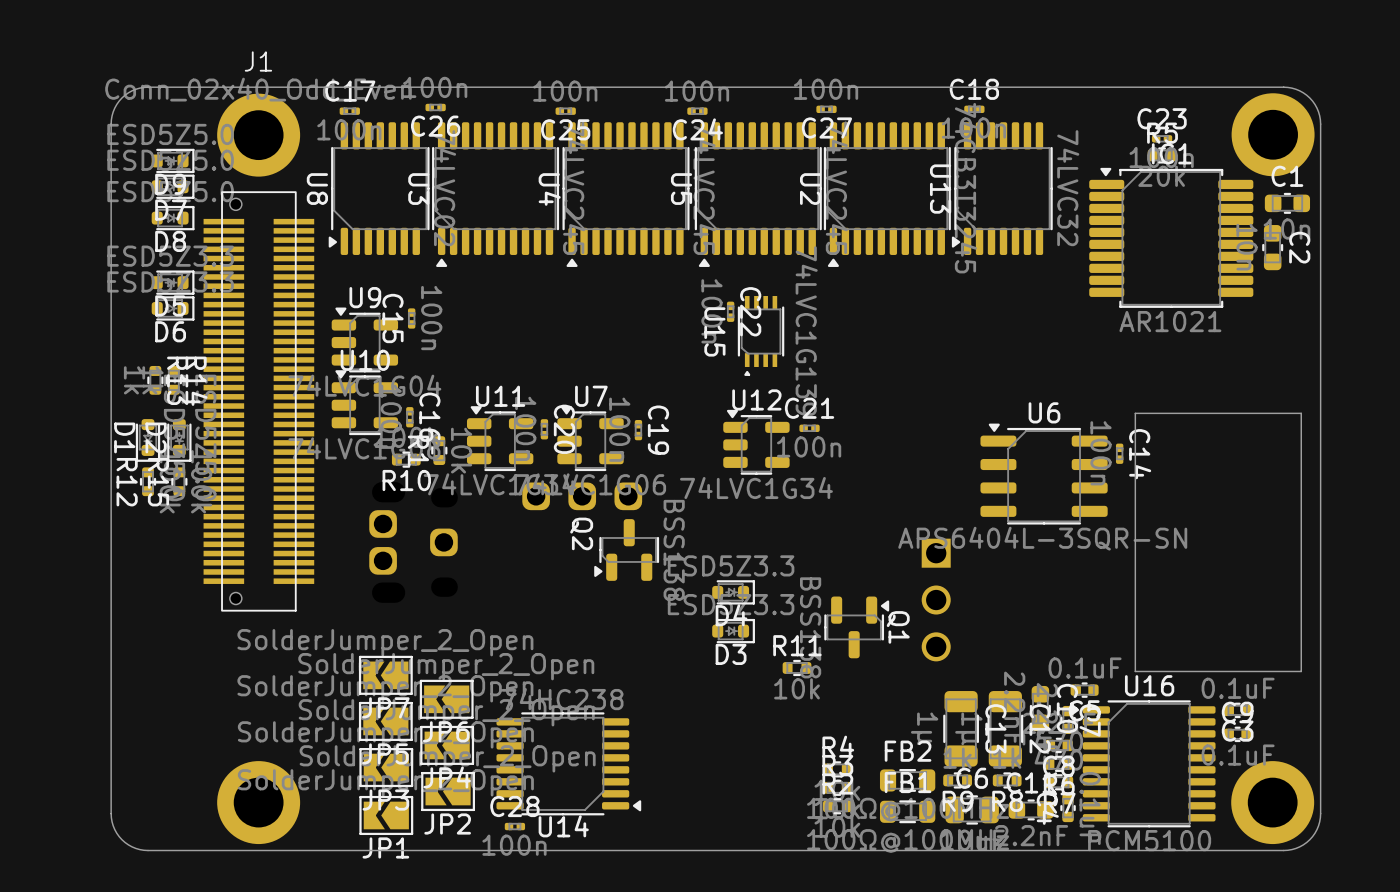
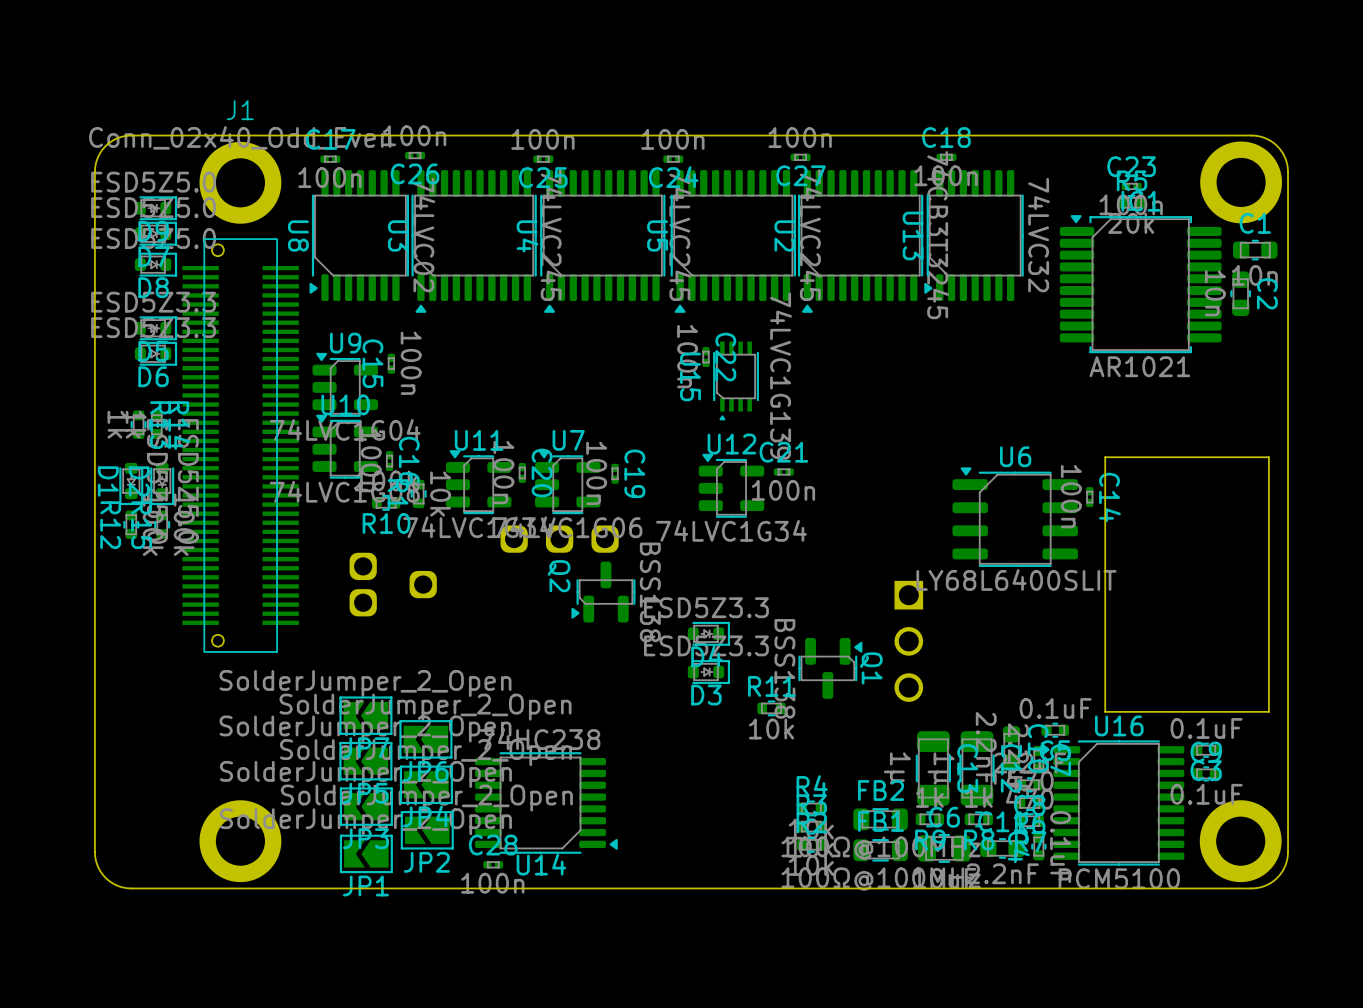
J1 footprint: [203, 191, 315, 612] -> [182, 238, 299, 653]
U6 value: APS6404L-3SQR-SN (1042, 538) -> LY68L6400SLIT (1016, 579)

